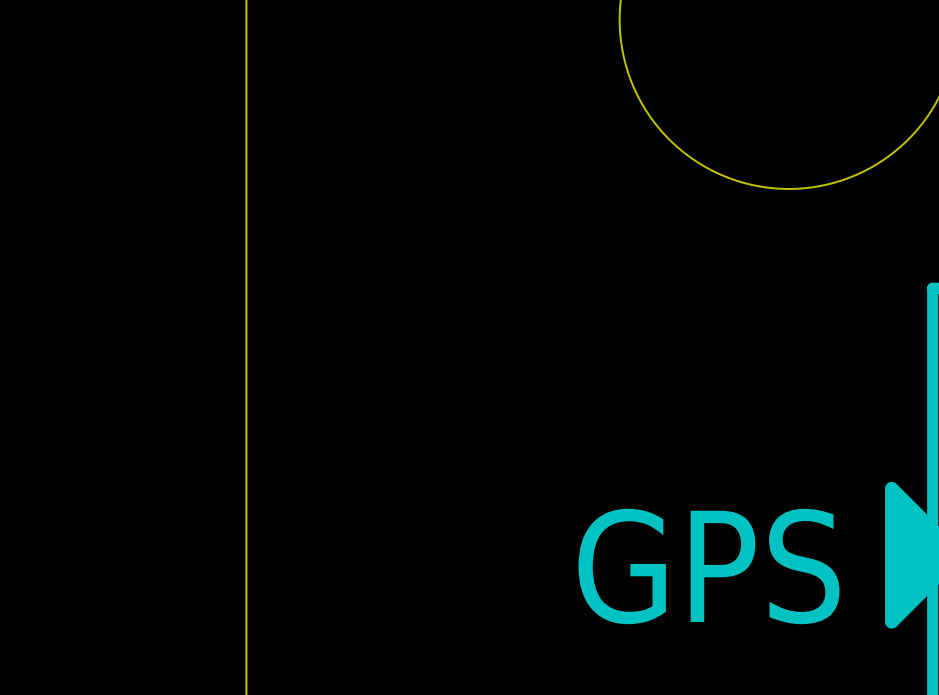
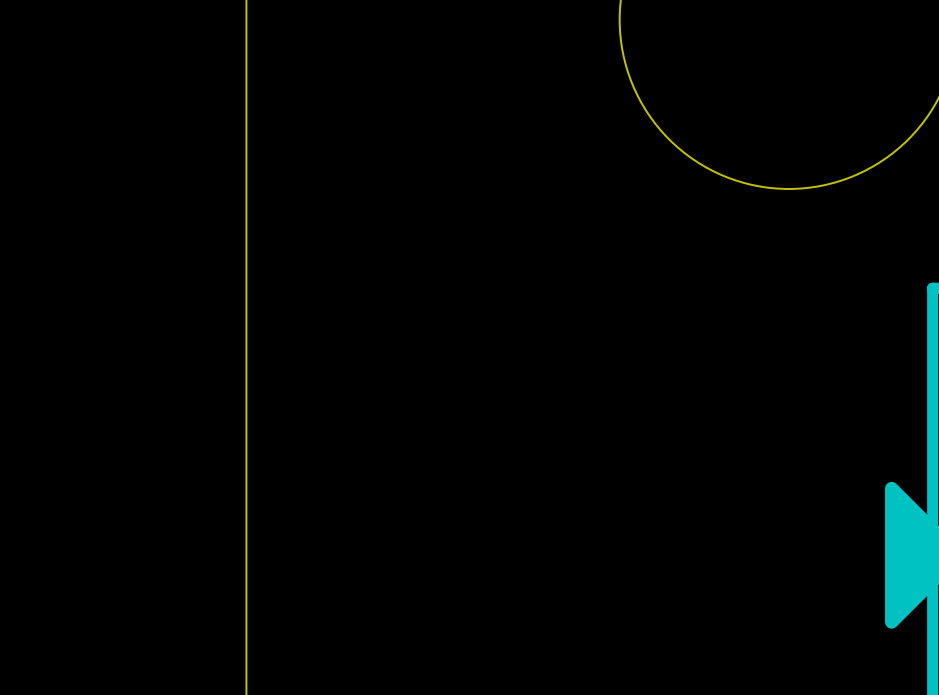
text: GPS (709, 566) -> none

